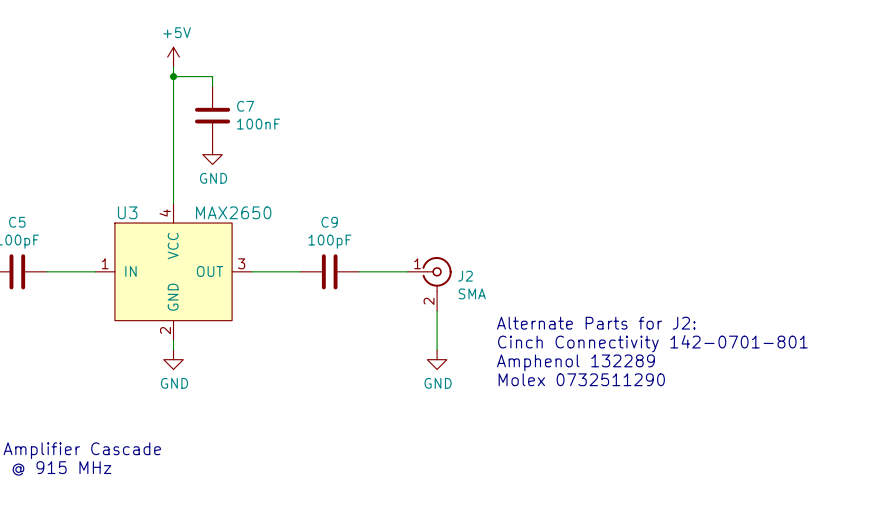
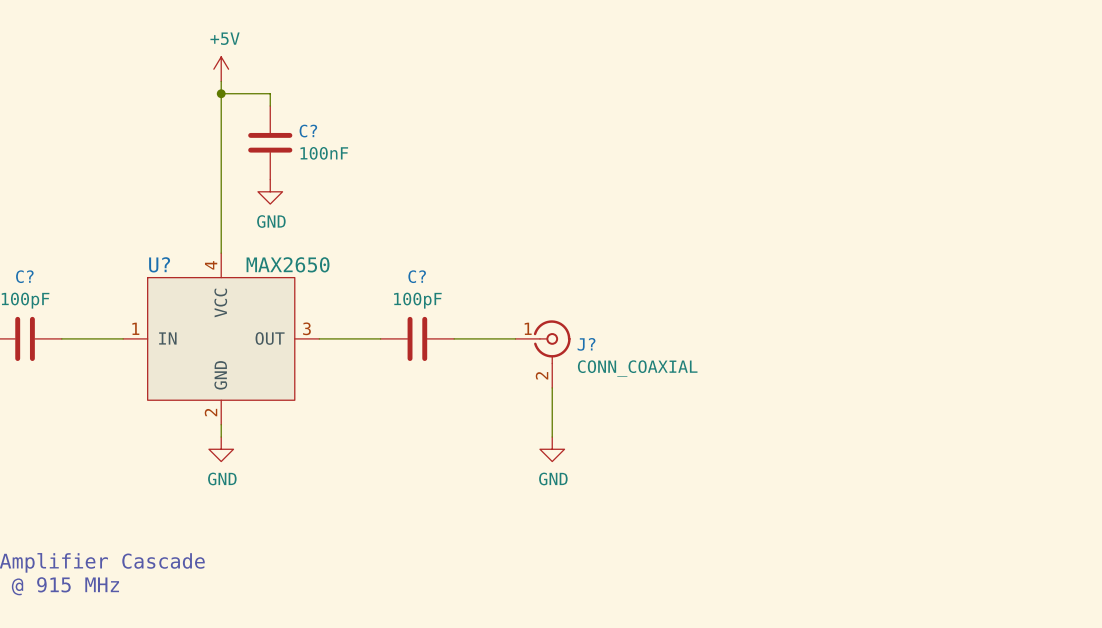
C7 name: C7 (245, 106) -> C? (308, 131)
U3 name: U3 (127, 212) -> U? (159, 264)
C5 name: C5 (17, 222) -> C? (24, 276)
C9 name: C9 (329, 222) -> C? (417, 276)
J2 name: J2 (465, 276) -> J? (586, 344)
J2 value: SMA (472, 293) -> CONN_COAXIAL (637, 368)
text: Alternate Parts for J2: (596, 323) -> none
text: Cinch Connectivity 142-0701-801 (652, 343) -> none
text: Amphenol 132289 (575, 362) -> none
text: Molex 0732511290 (581, 379) -> none

